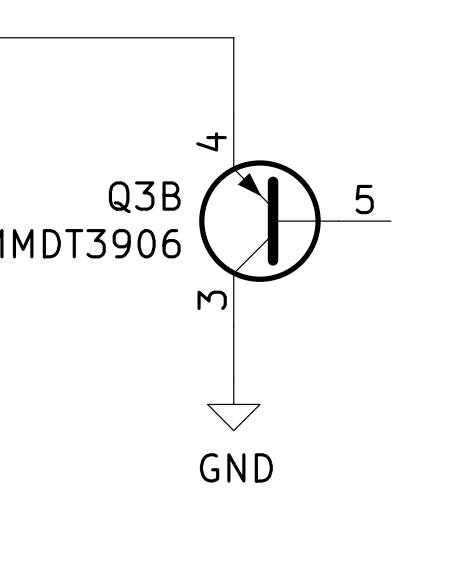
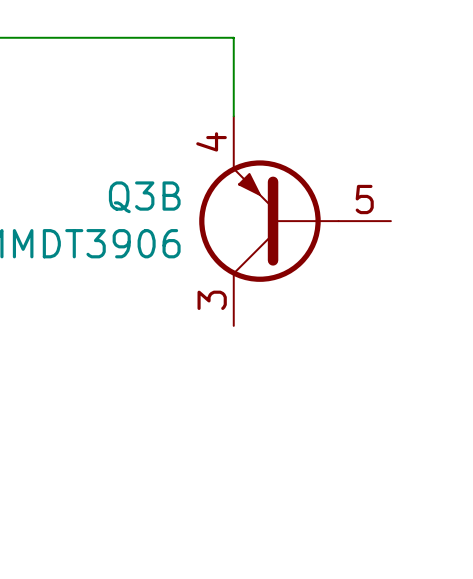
wire: (233, 325) (233, 378) -> none
power symbol: GND (233, 404) -> none

